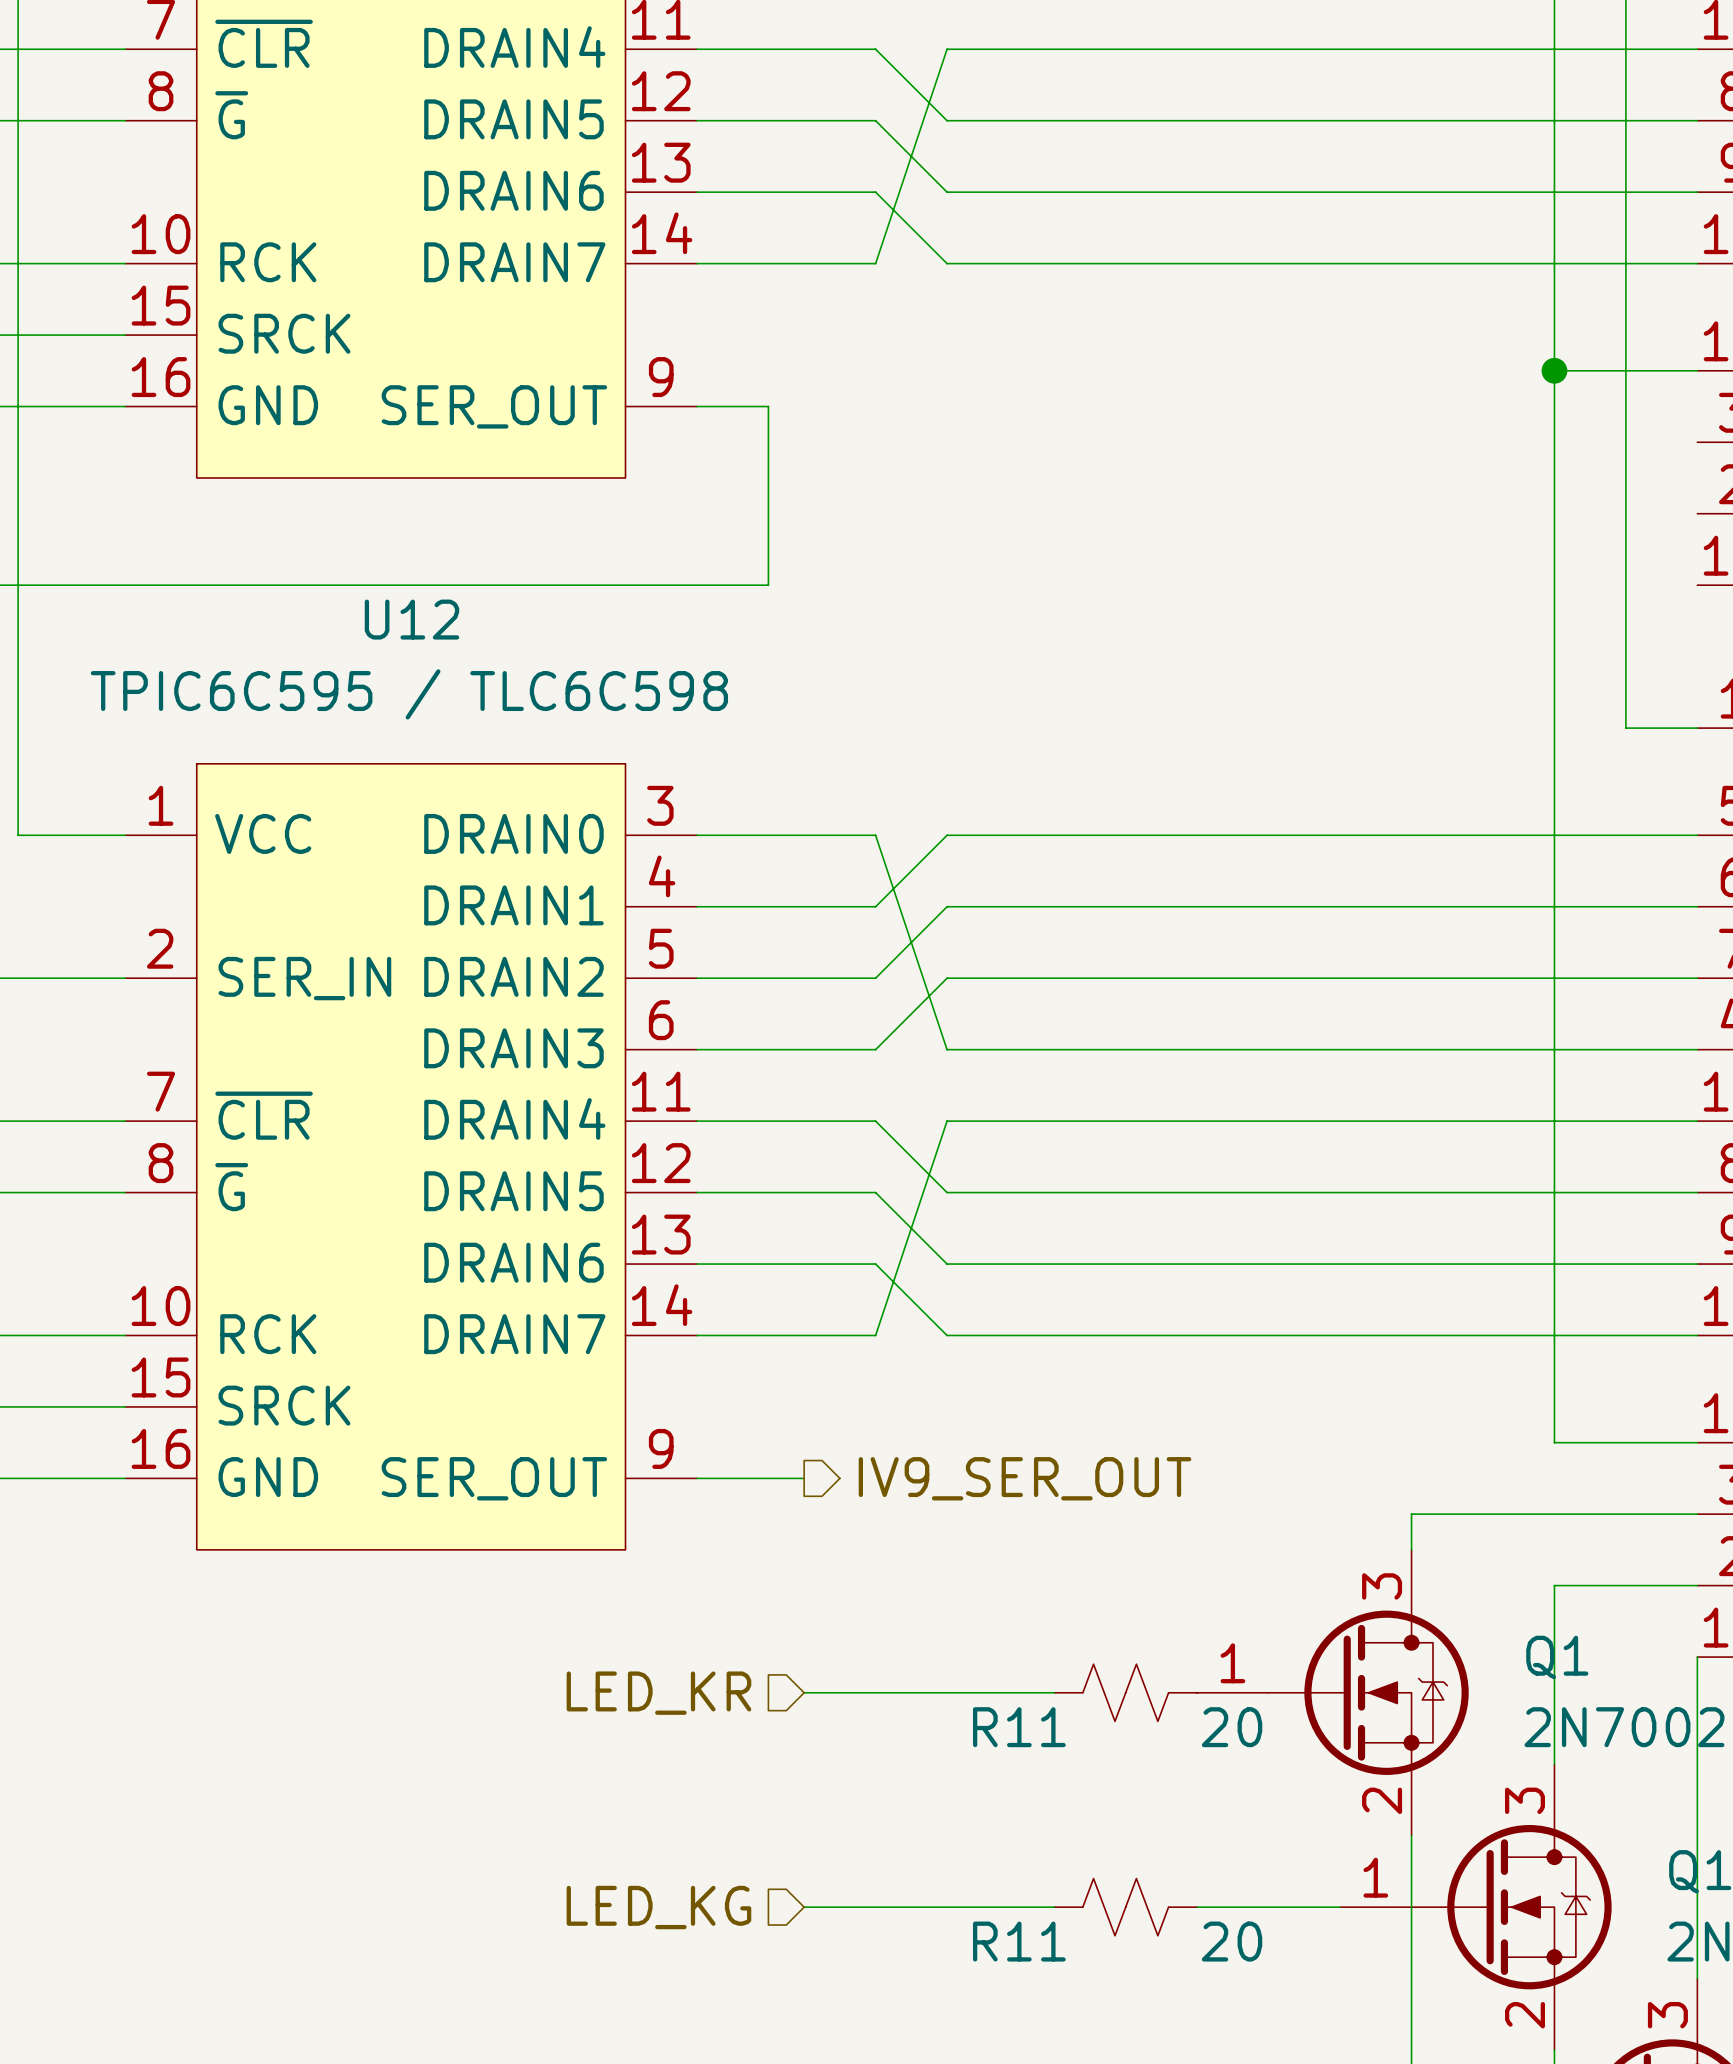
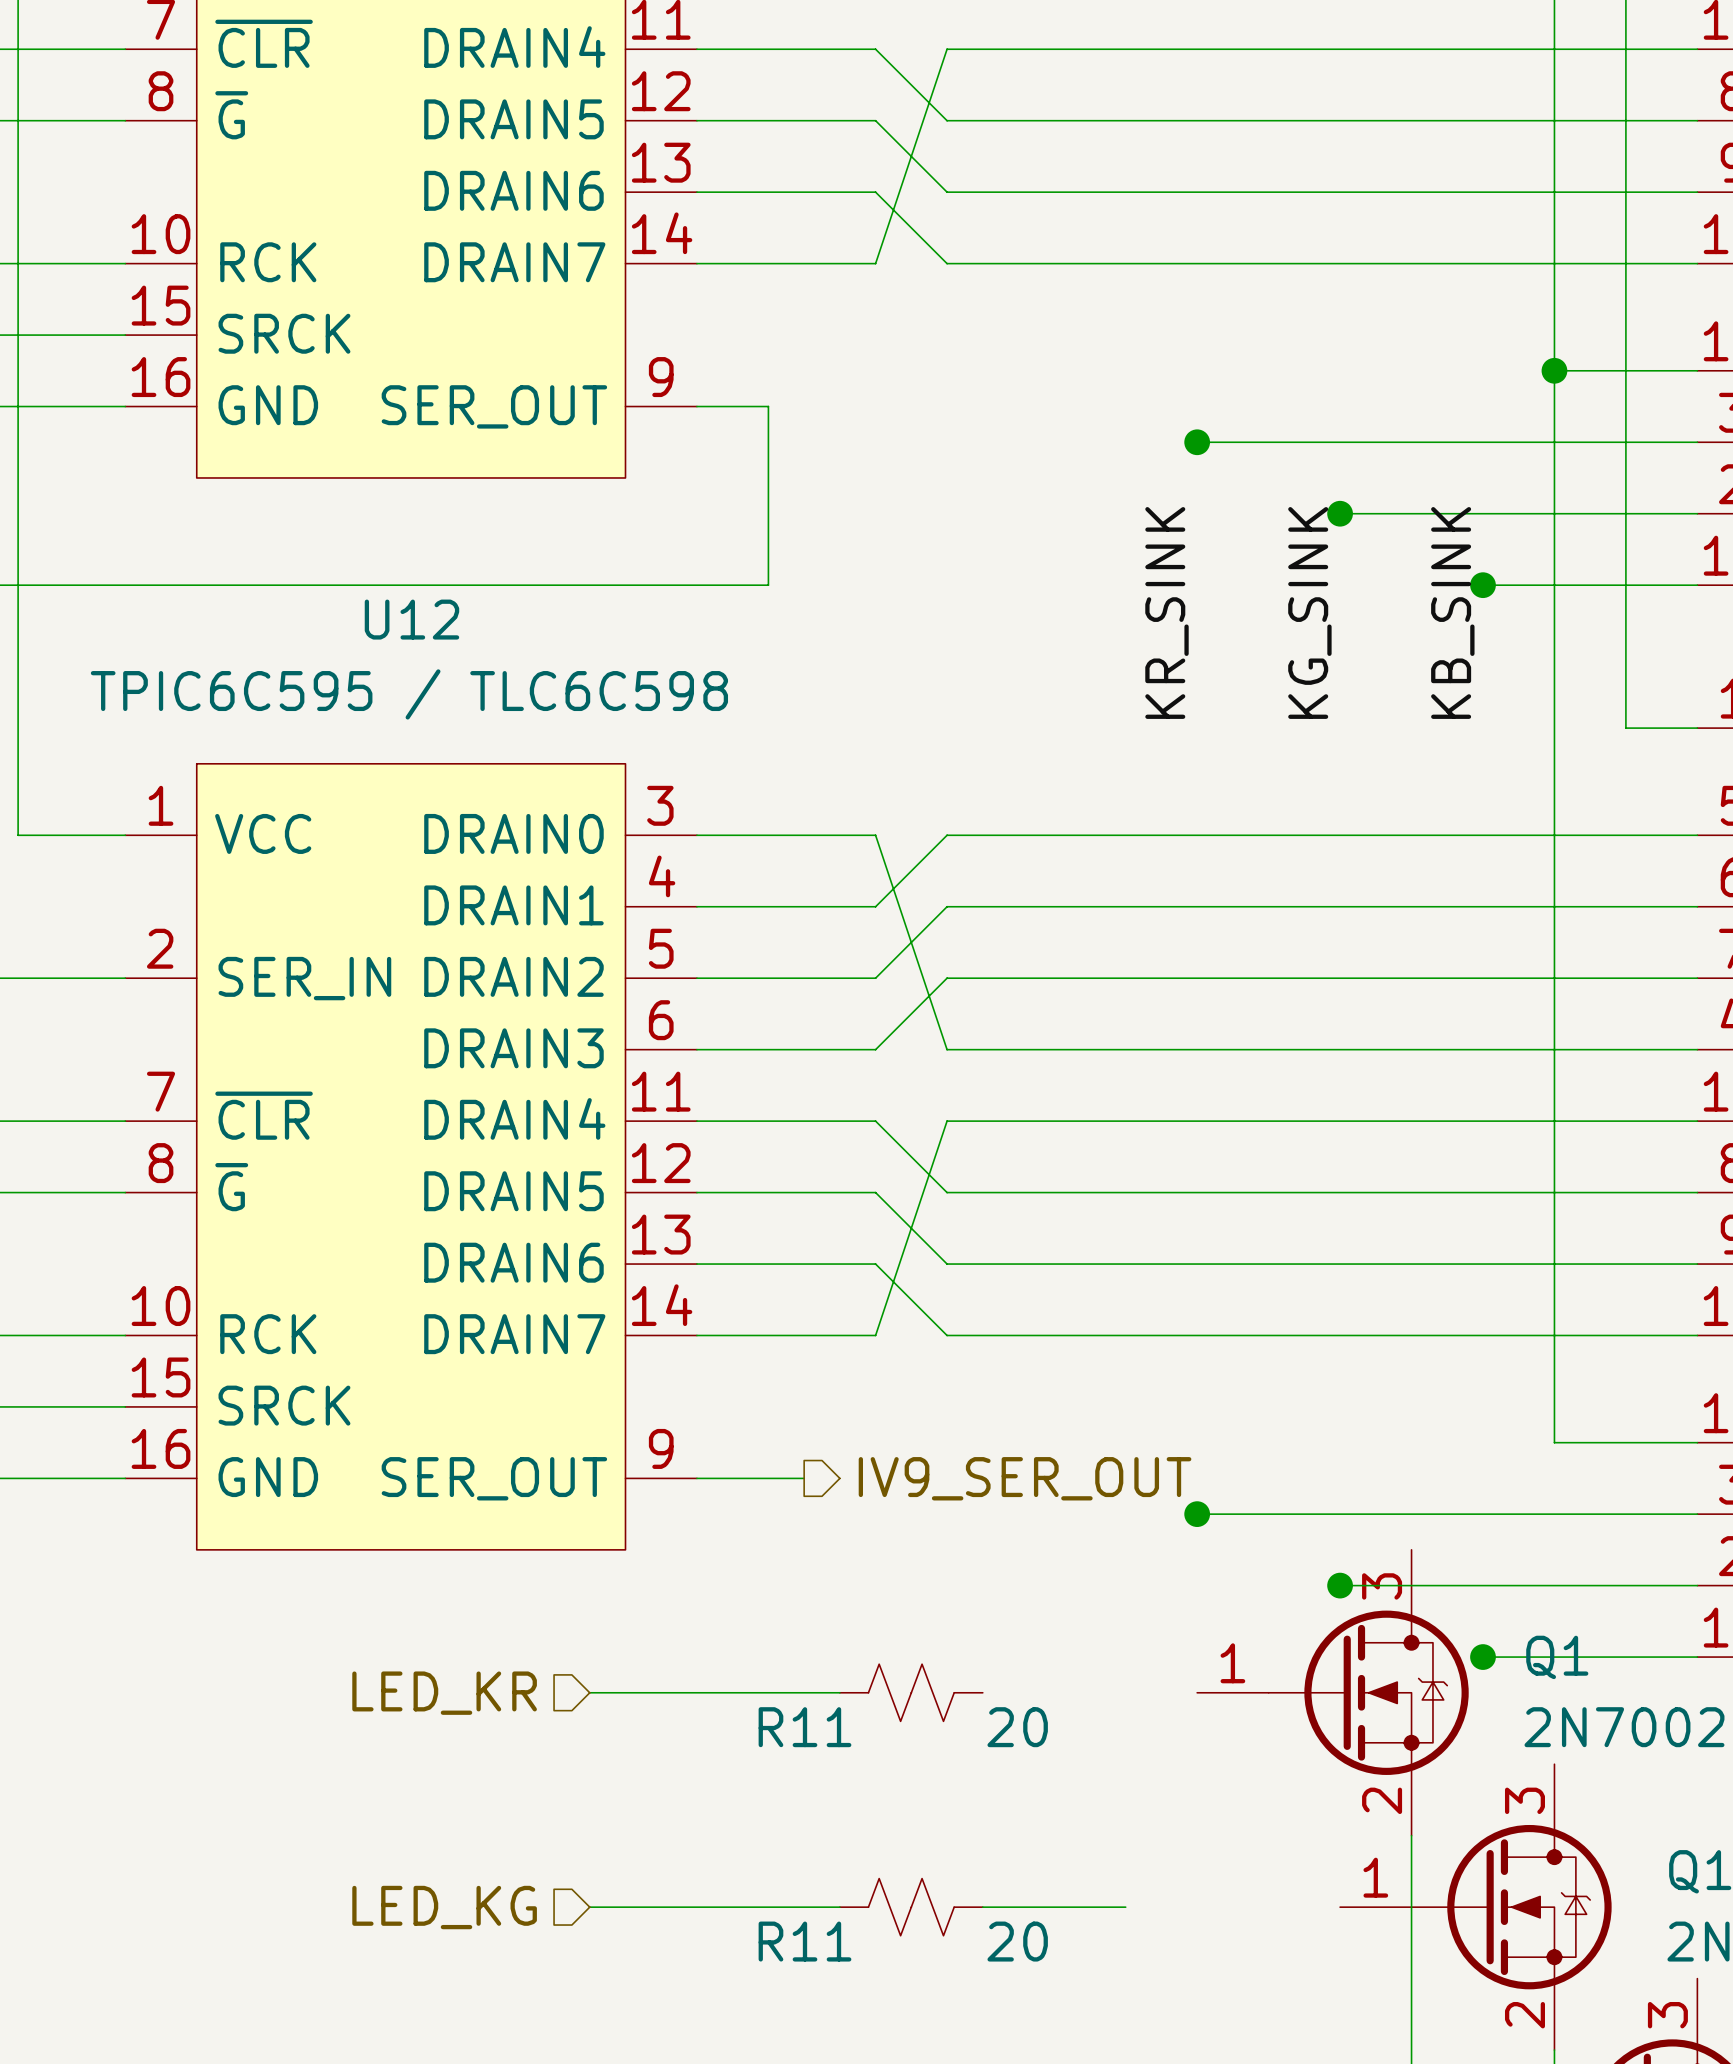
wire: none -> (1197, 442) (1697, 442)
junction: none -> (1197, 442)
wire: none -> (1340, 513) (1697, 513)
junction: none -> (1340, 513)
wire: none -> (1483, 585) (1697, 585)
junction: none -> (1483, 585)
label: none -> KR_SINK (1166, 612)
label: none -> KG_SINK (1309, 612)
label: none -> KB_SINK (1452, 612)
junction: none -> (1197, 1514)
wire: (1411, 1514) (1411, 1549) -> (1411, 1514) (1197, 1514)
junction: none -> (1340, 1585)
wire: (1554, 1585) (1554, 1764) -> (1554, 1585) (1340, 1585)
junction: none -> (1483, 1657)
wire: (1697, 1657) (1697, 1978) -> (1697, 1657) (1483, 1657)
wire: (839, 1692) (1054, 1692) -> (589, 1692) (804, 1692)
R11: none -> 20 (911, 1692)
R11: 20 (1125, 1692) -> none
hierarchical label position: LED_KR (658, 1693) -> LED_KR (444, 1693)
wire: none -> (589, 1907) (804, 1907)
hierarchical label position: LED_KG (658, 1907) -> LED_KG (444, 1907)
wire: (839, 1907) (982, 1907) -> none
R11: none -> 20 (911, 1907)
wire: none -> (1054, 1907) (1125, 1907)
R11: 20 (1125, 1907) -> none
wire: (1197, 1907) (1340, 1907) -> none

